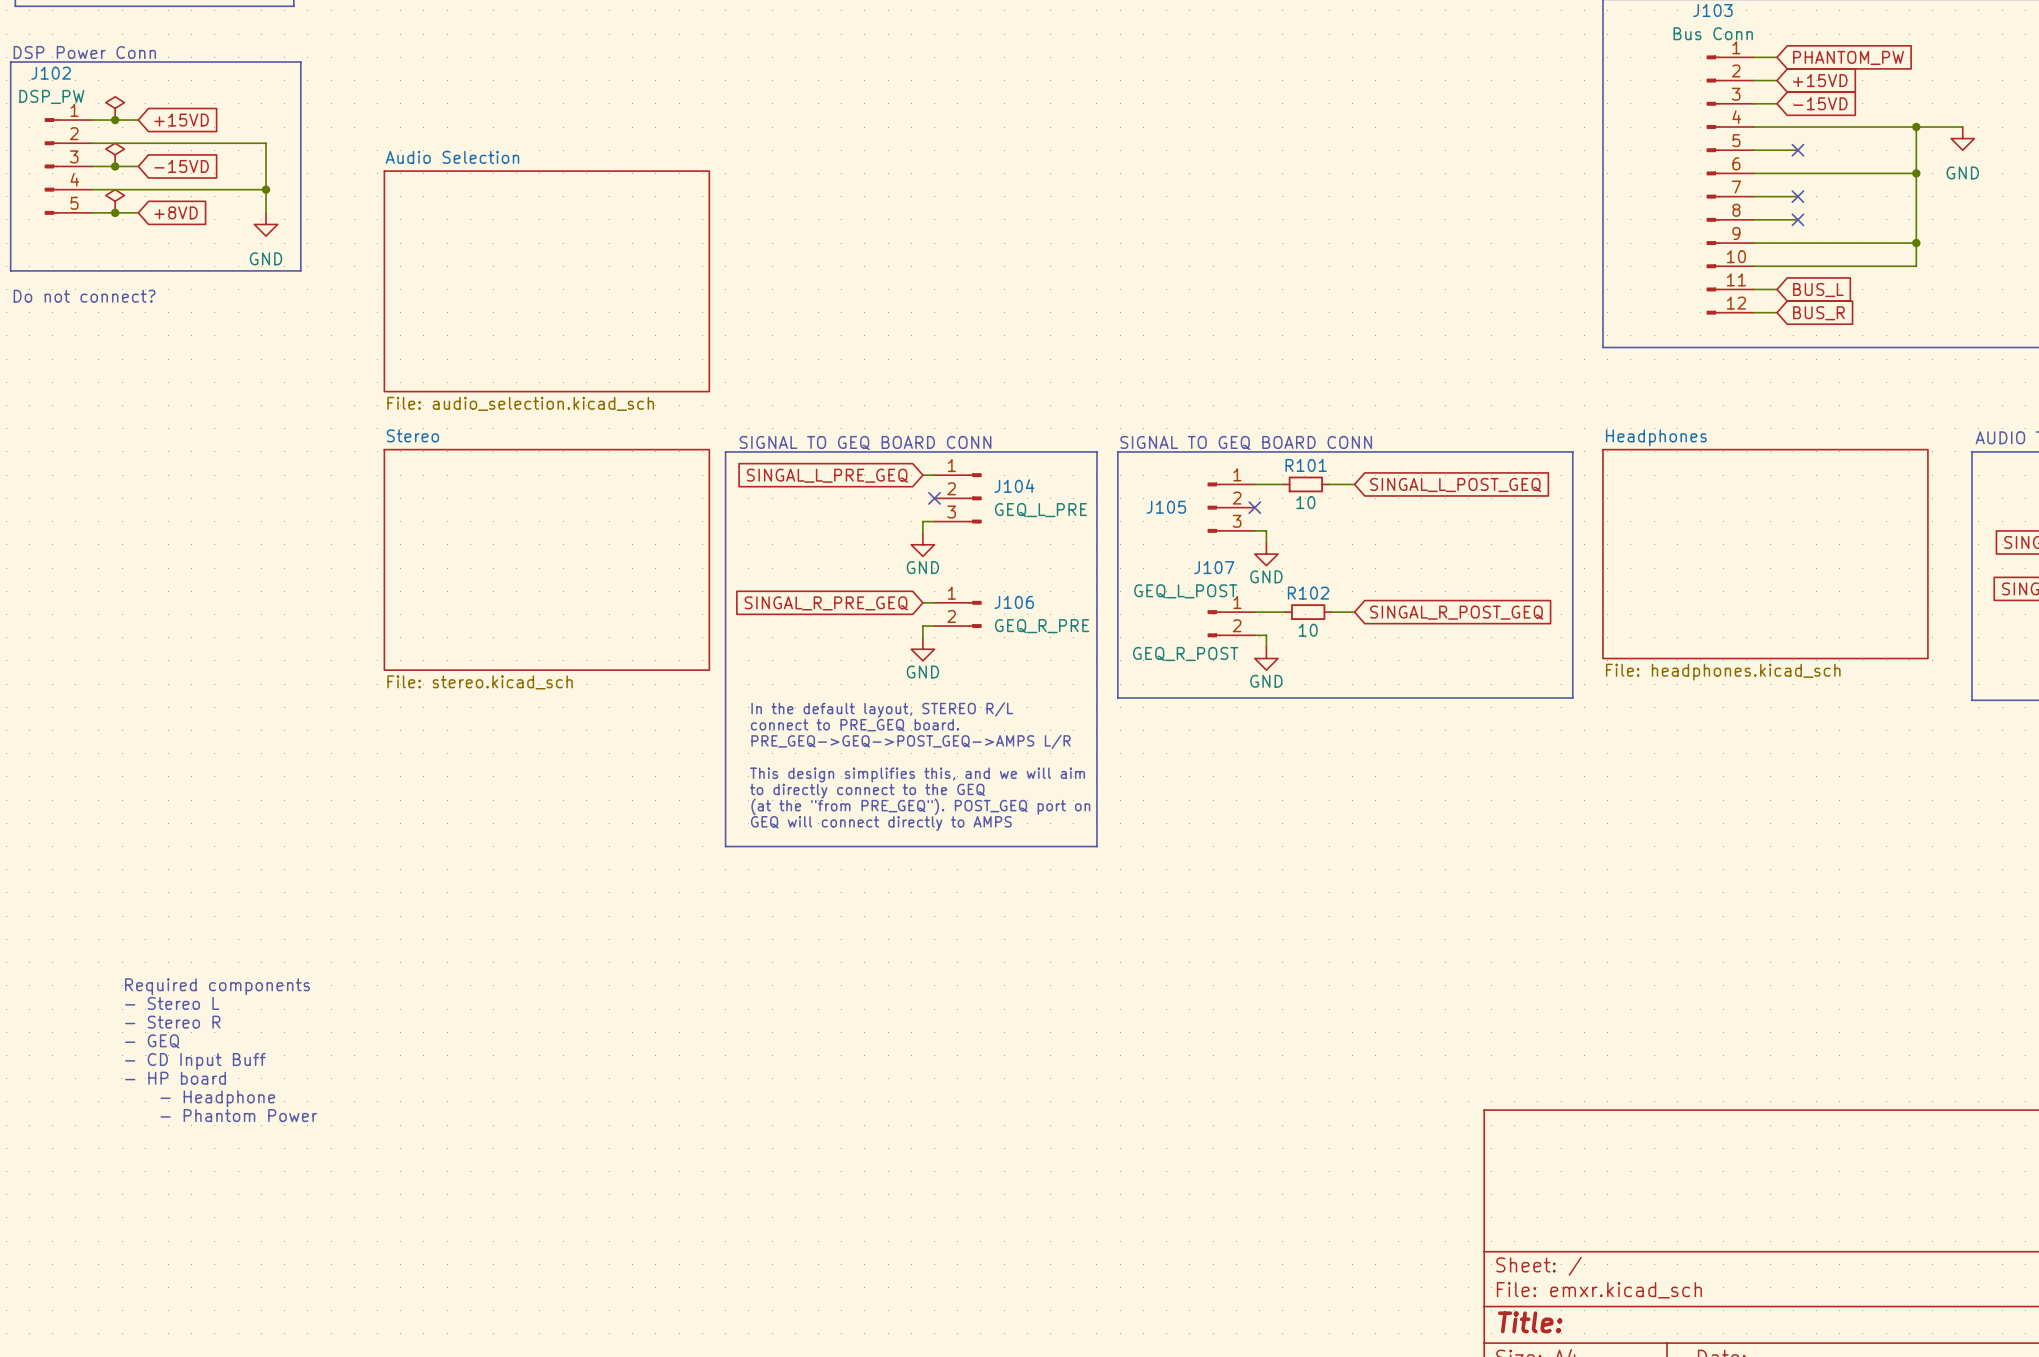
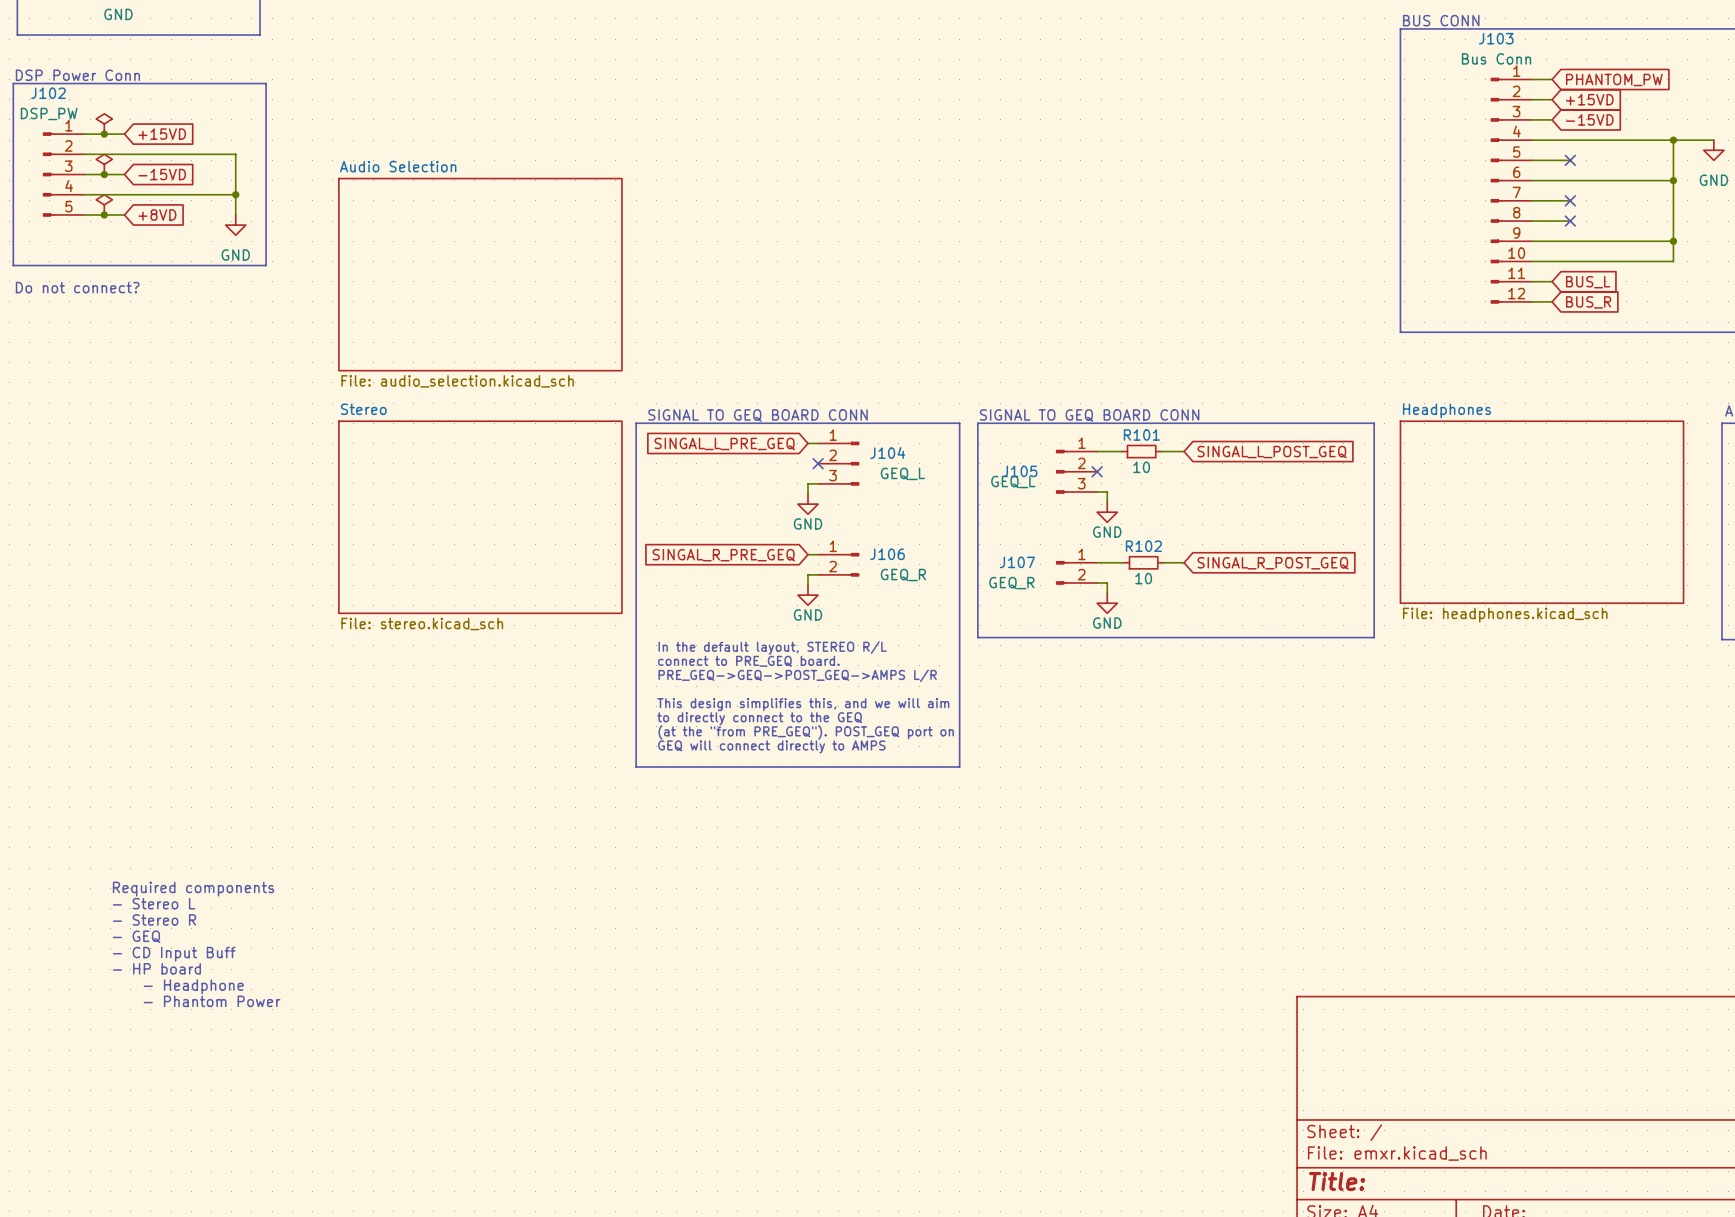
J104 value: GEQ_L_PRE (1040, 510) -> GEQ_L (902, 473)
J107 name position: J107 (1214, 567) -> J107 (1017, 562)
J105 value: GEQ_L_POST (1185, 591) -> GEQ_L (1013, 481)
J106 value: GEQ_R_PRE (1042, 626) -> GEQ_R (903, 575)
J107 value: GEQ_R_POST (1185, 654) -> GEQ_R (1011, 583)

